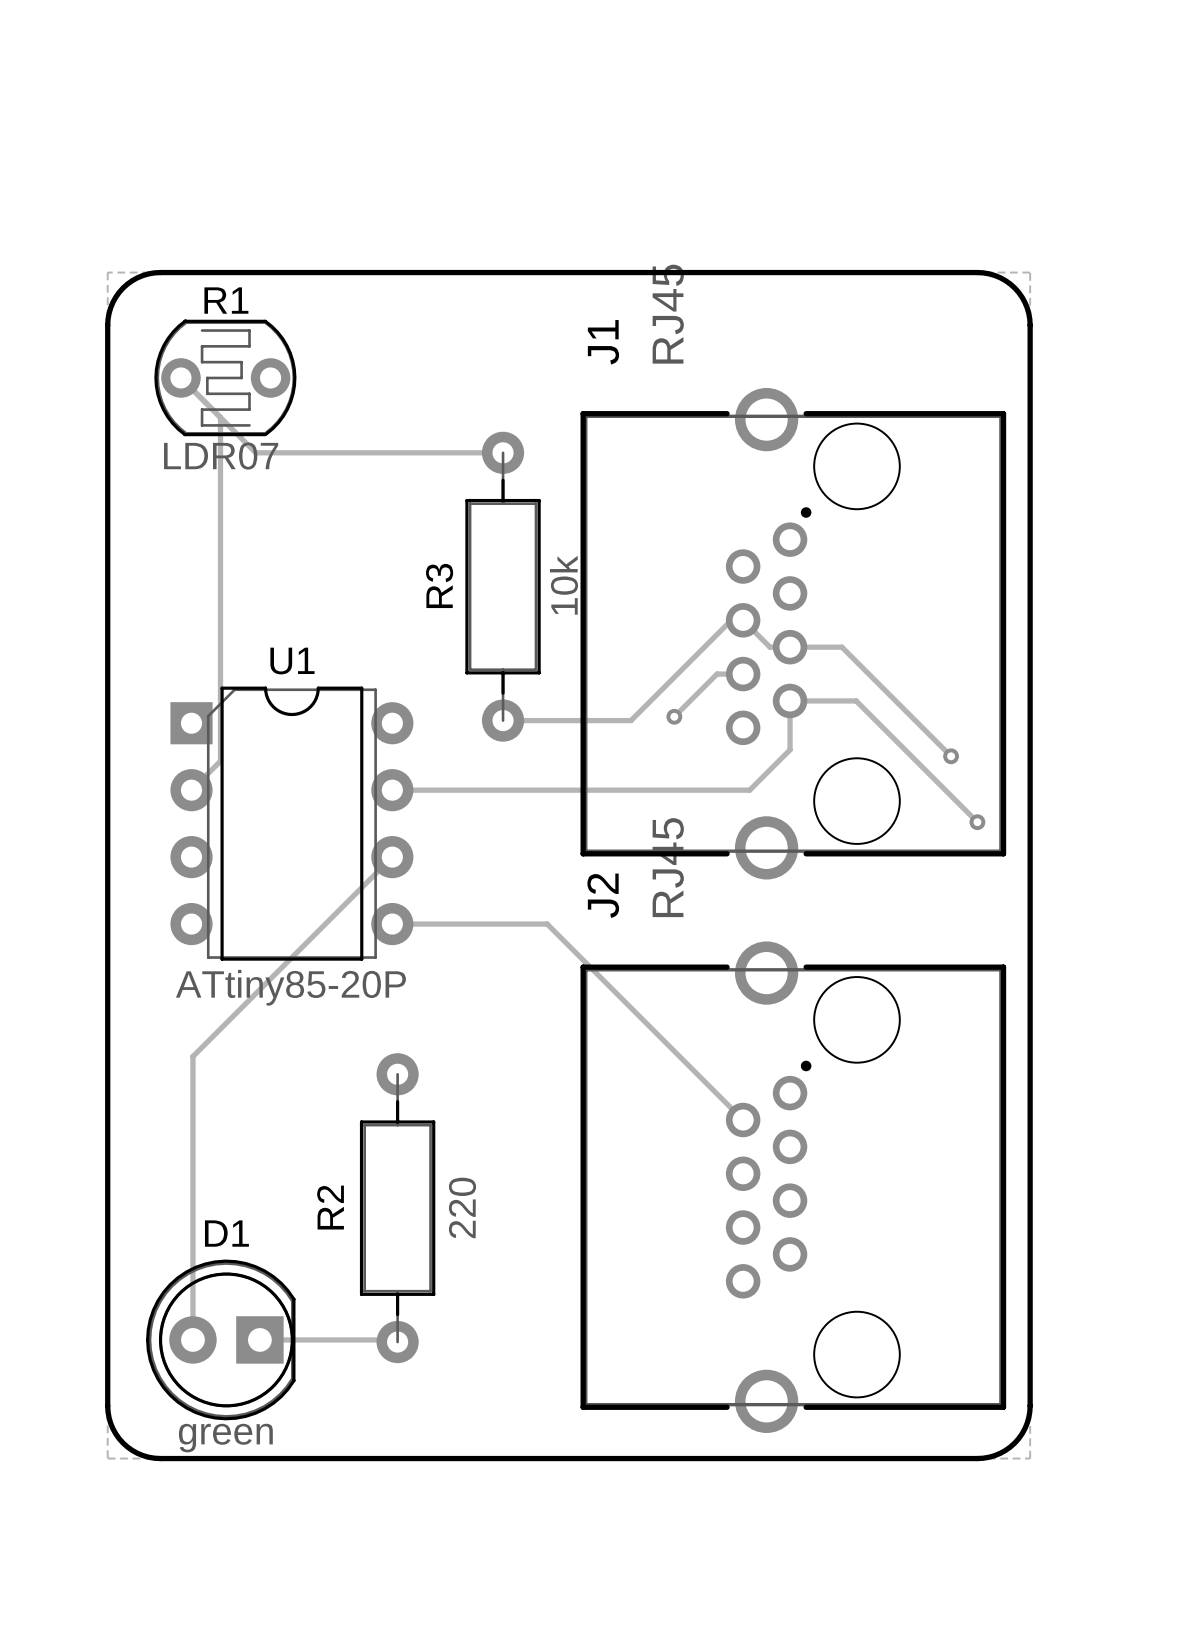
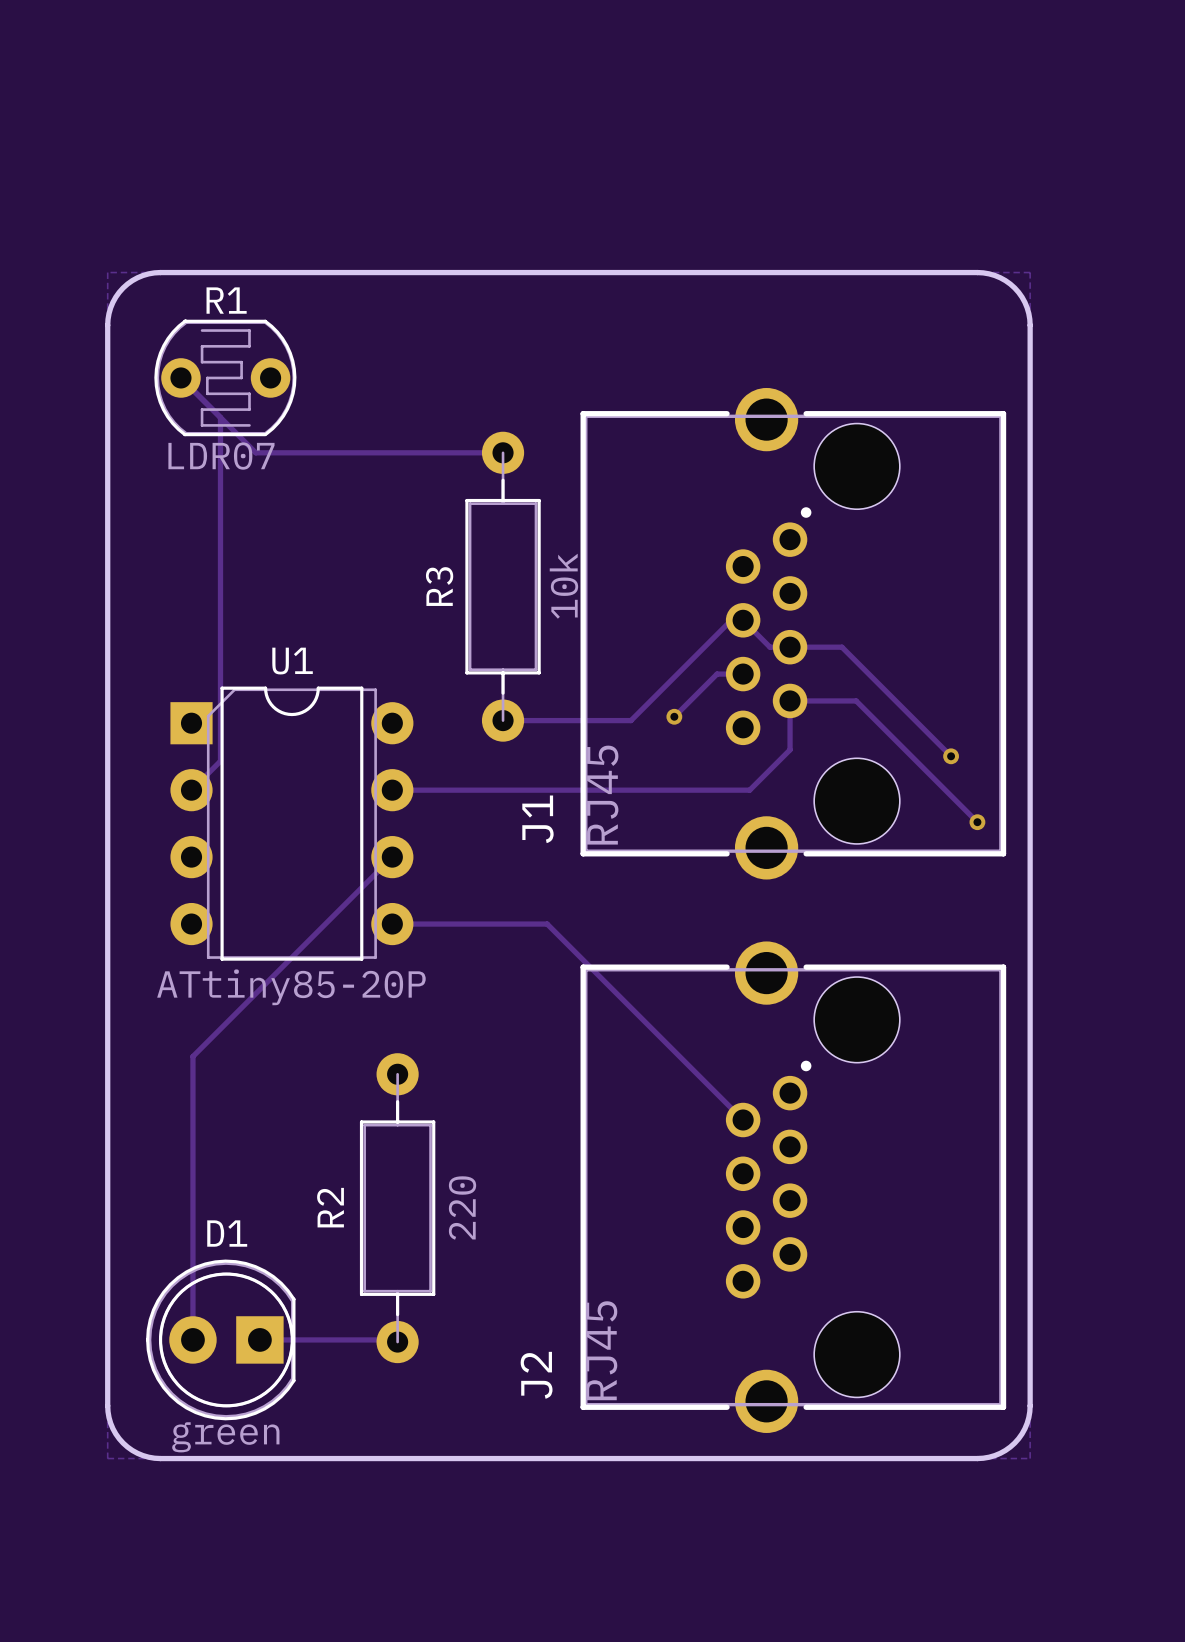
J1 value position: RJ45 (668, 314) -> RJ45 (602, 795)
J1 name position: J1 (603, 342) -> J1 (537, 819)
J2 value position: RJ45 (668, 867) -> RJ45 (601, 1350)
J2 name position: J2 (603, 895) -> J2 (536, 1375)

